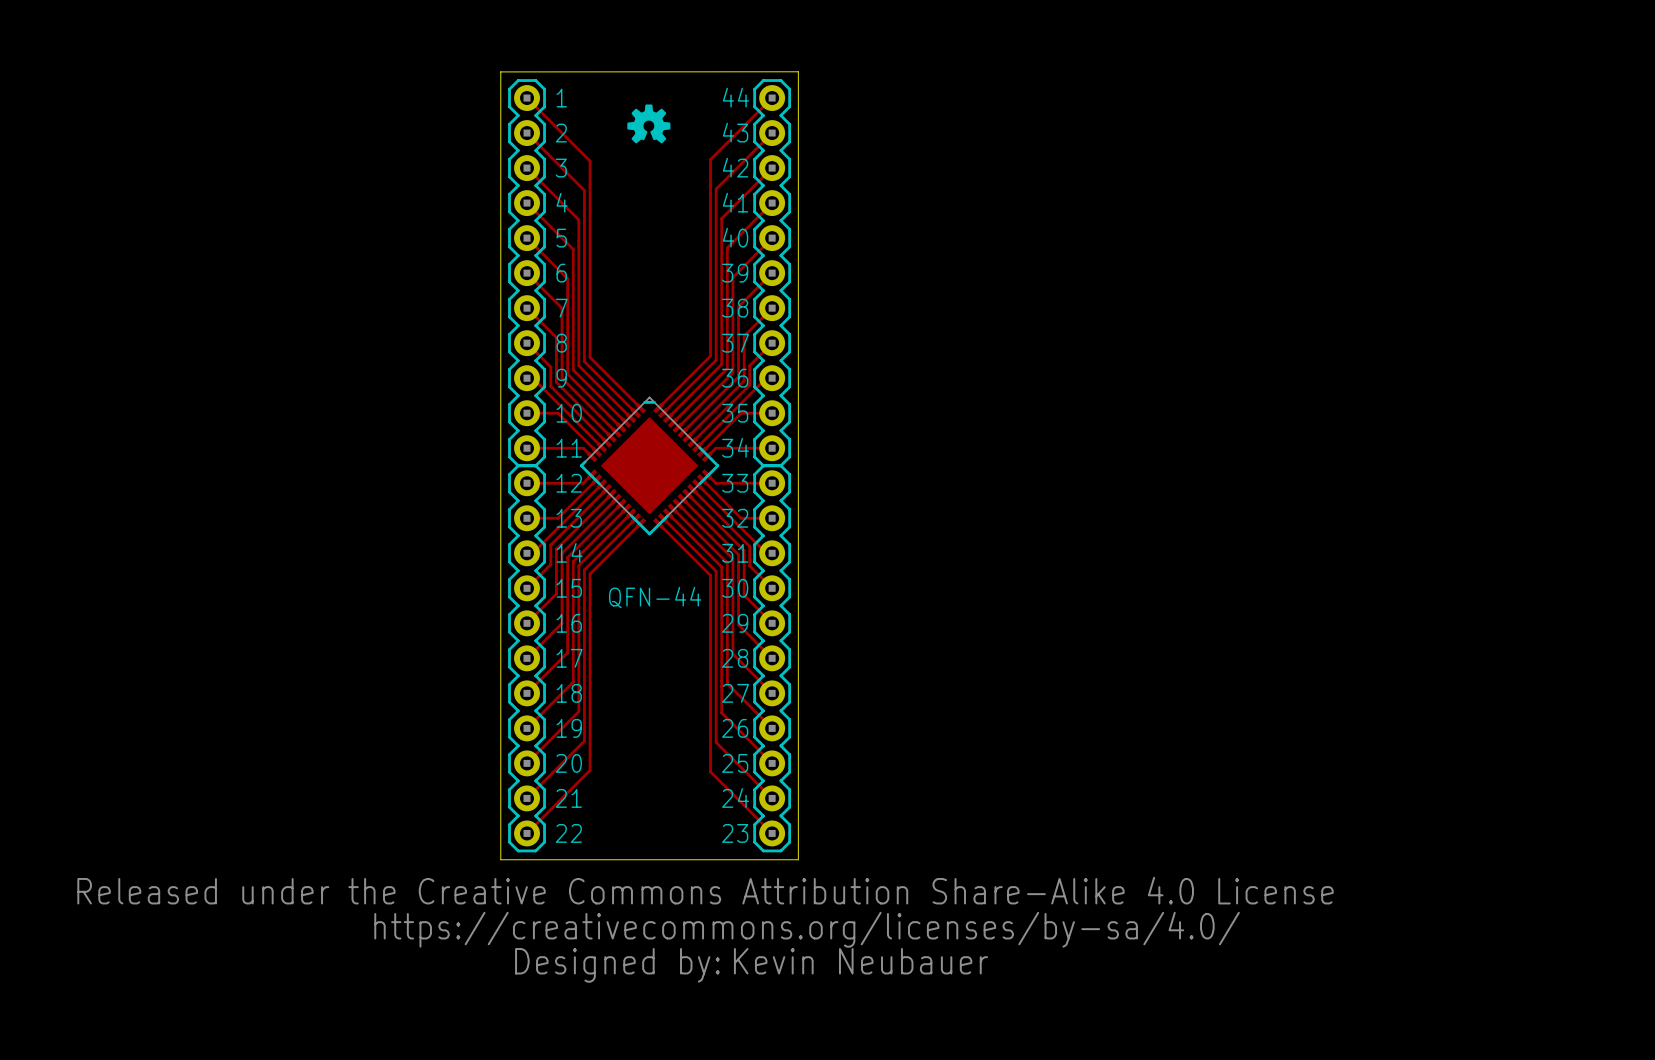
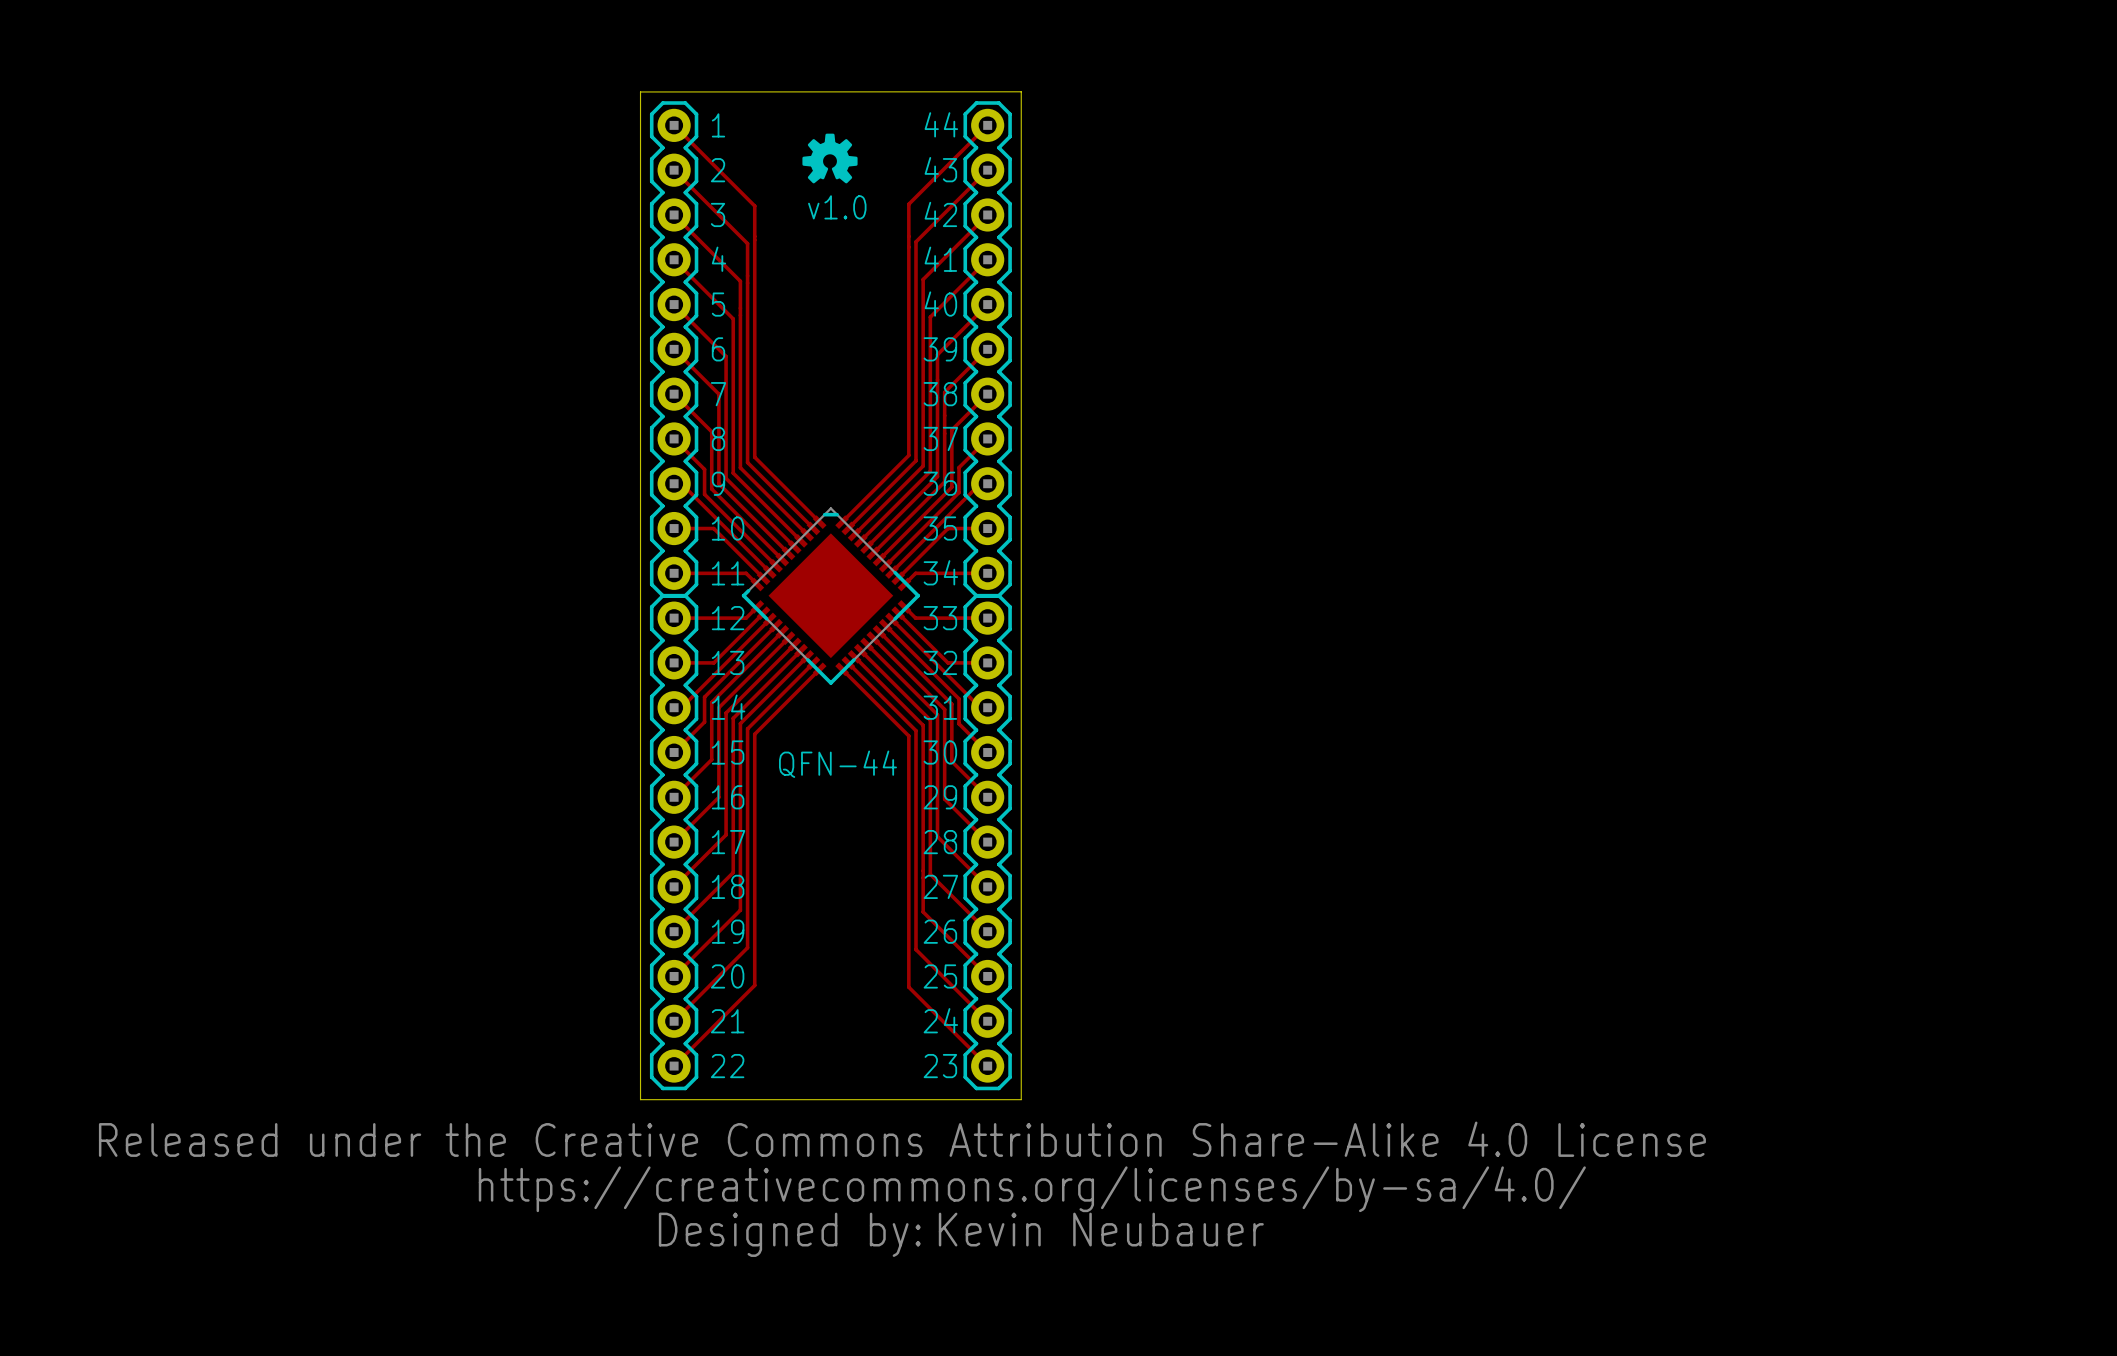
text: none -> v1.0 (837, 207)

